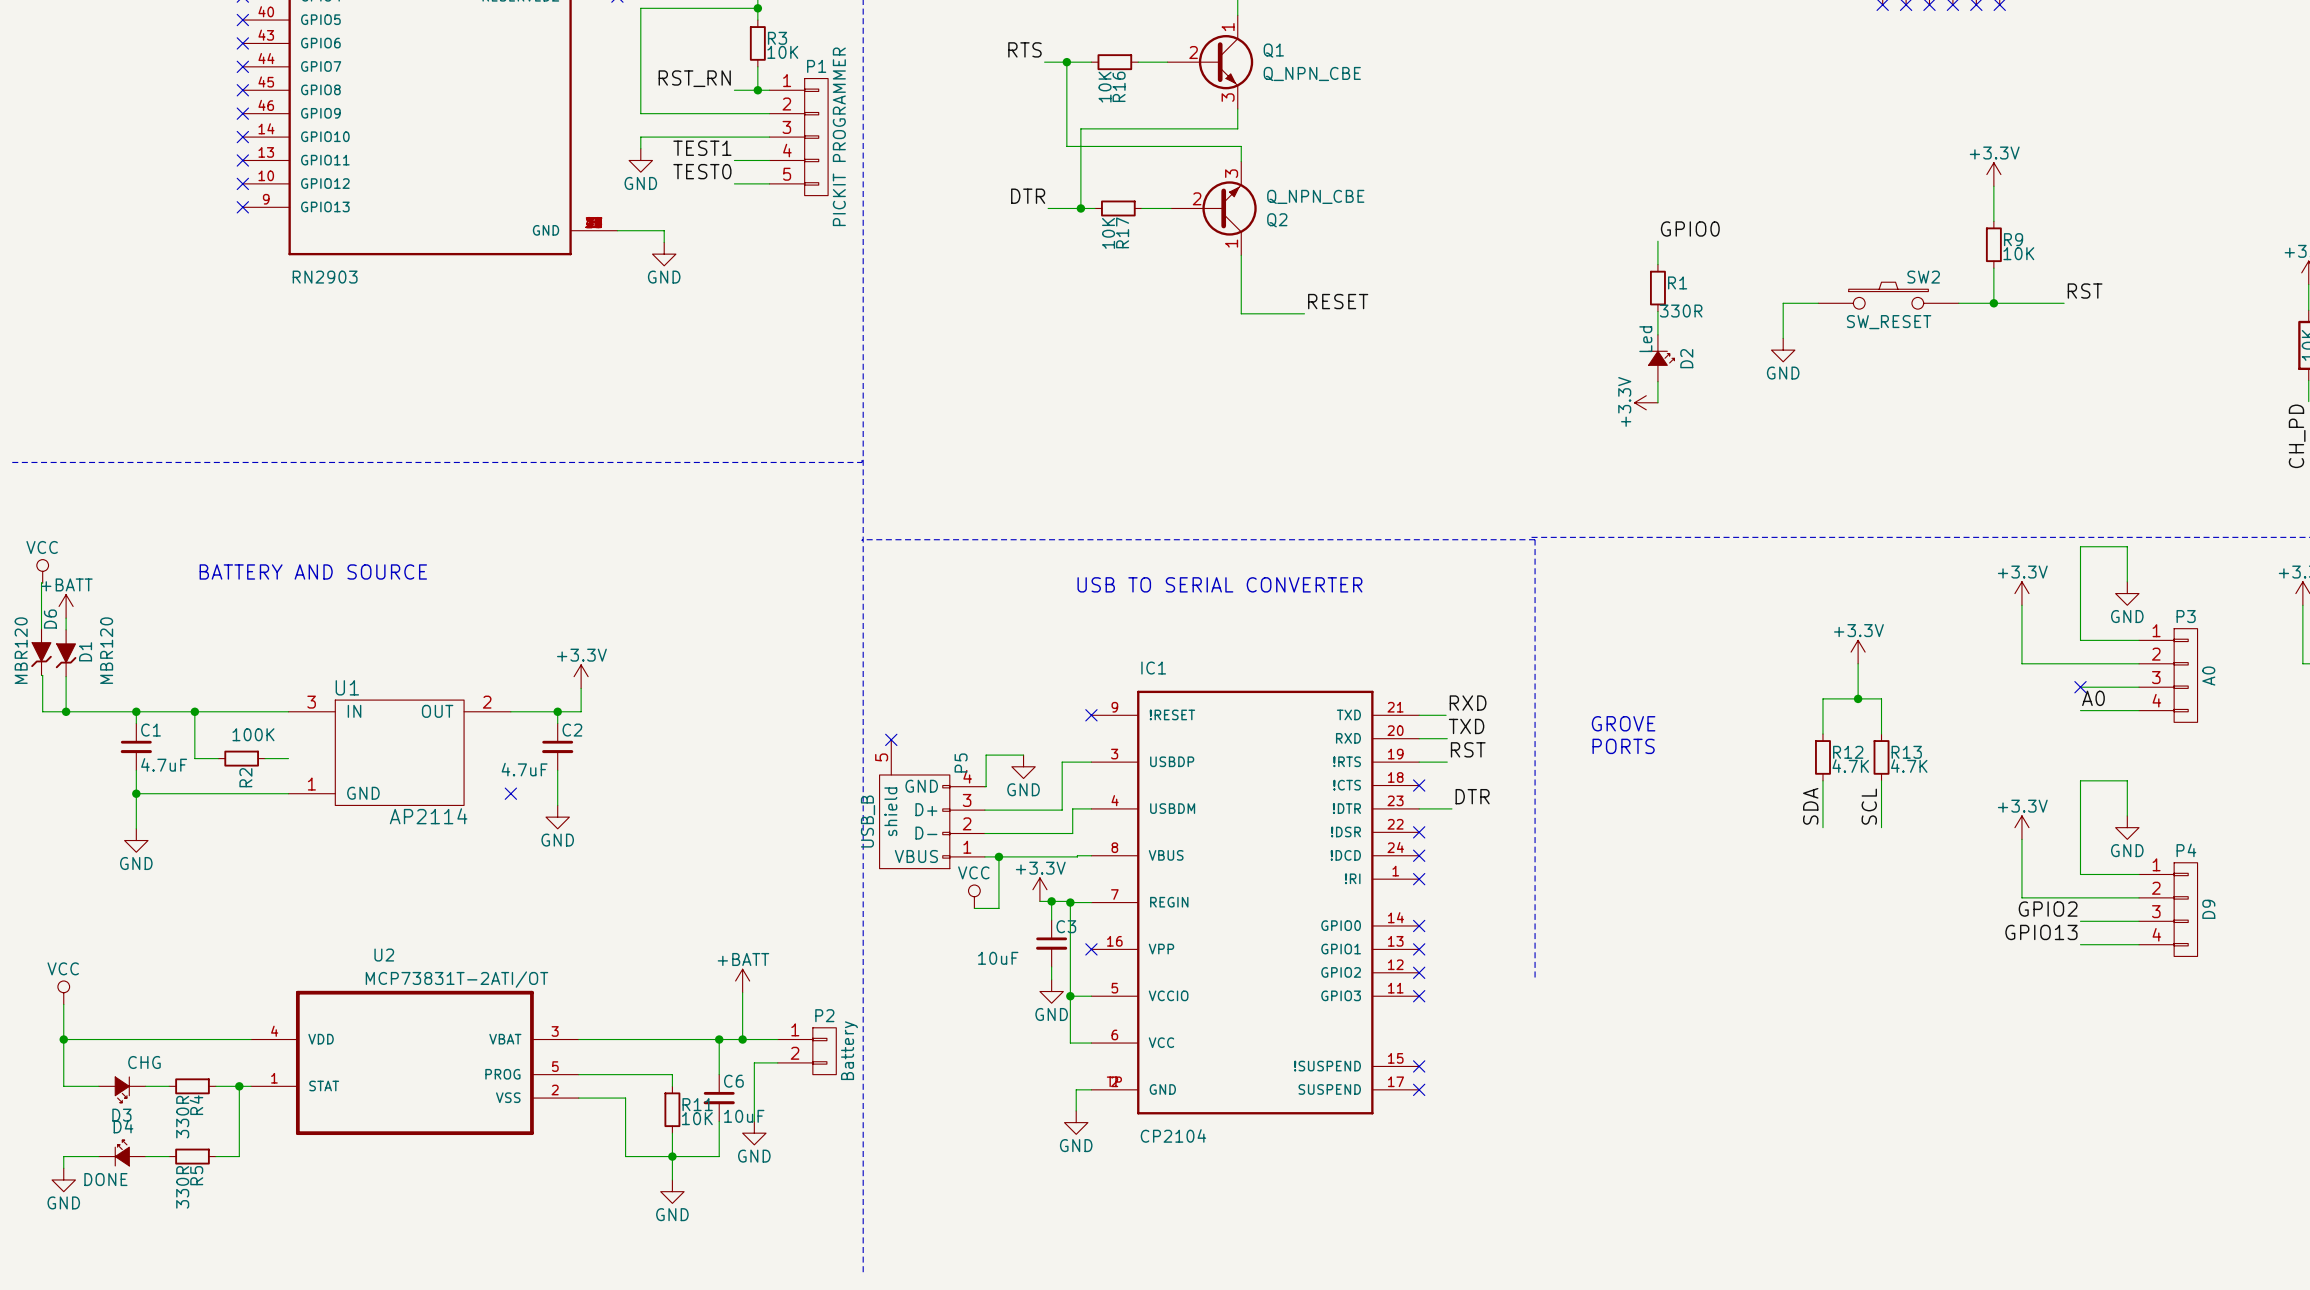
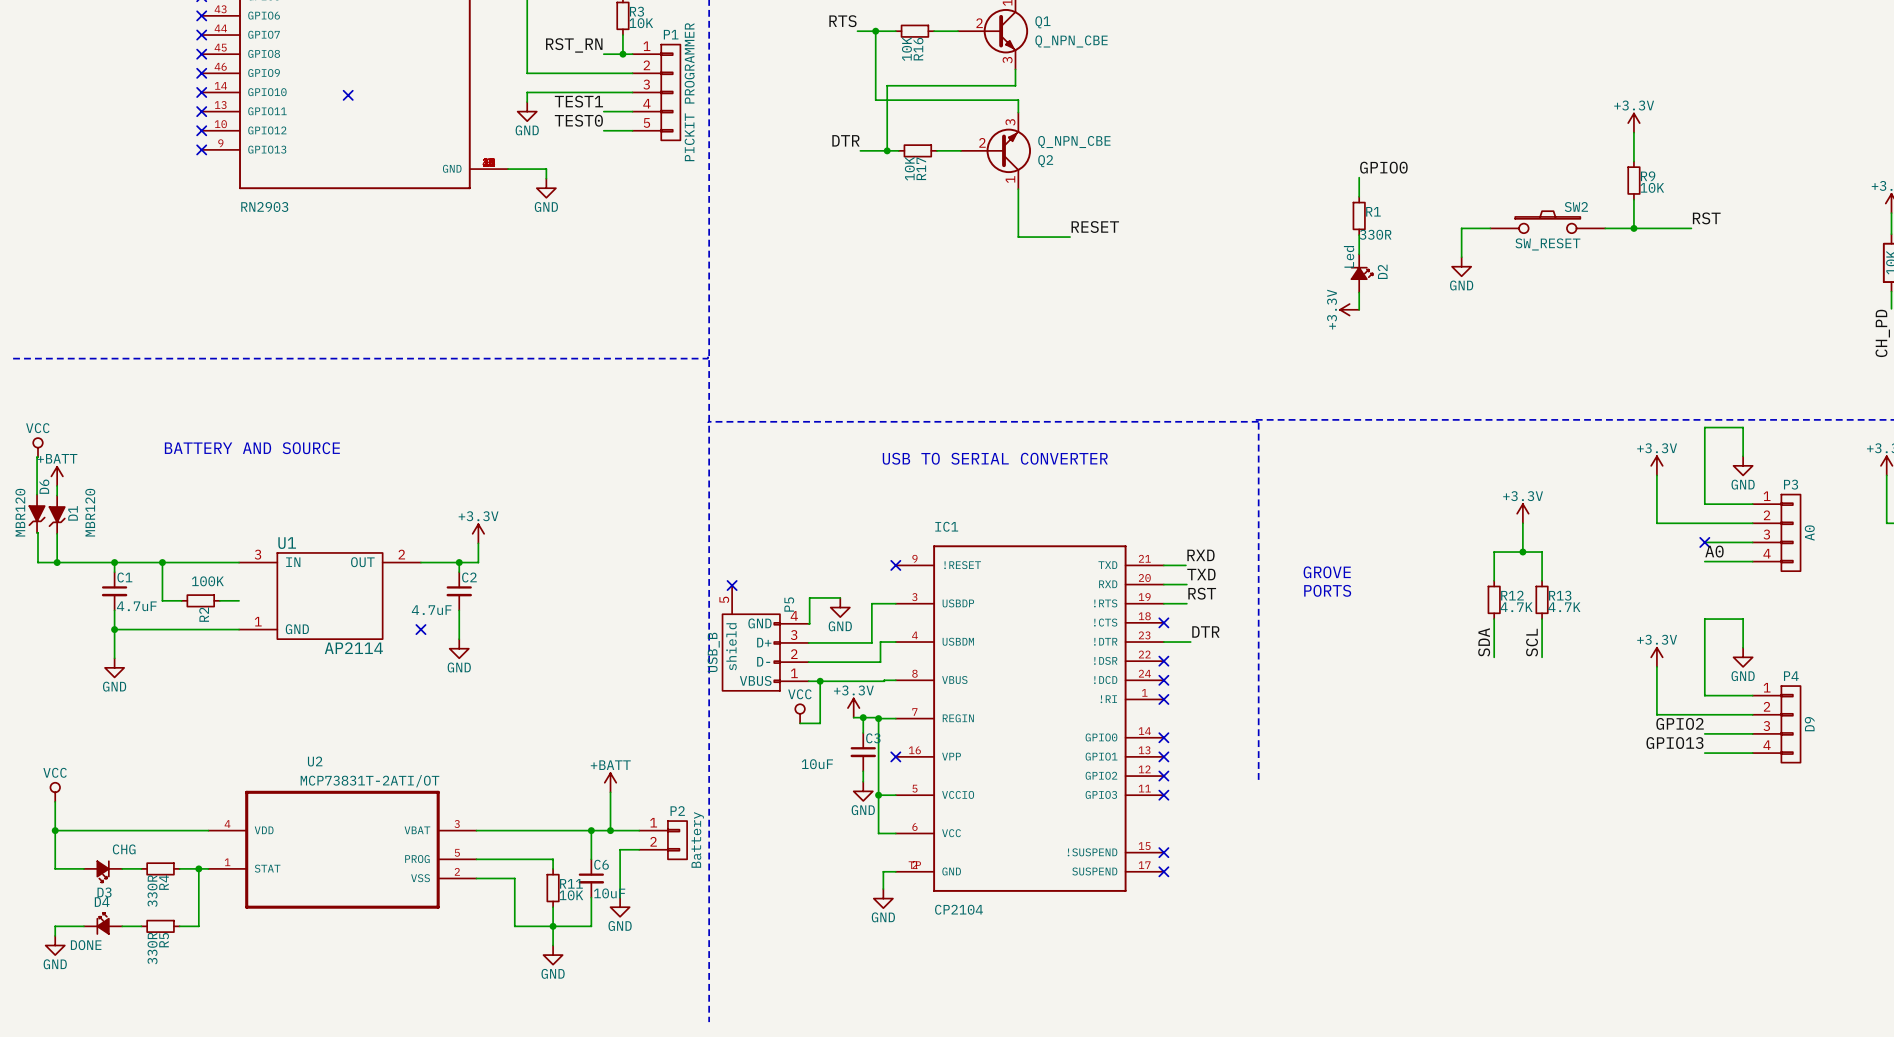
no-connect mark: none -> (348, 95)

